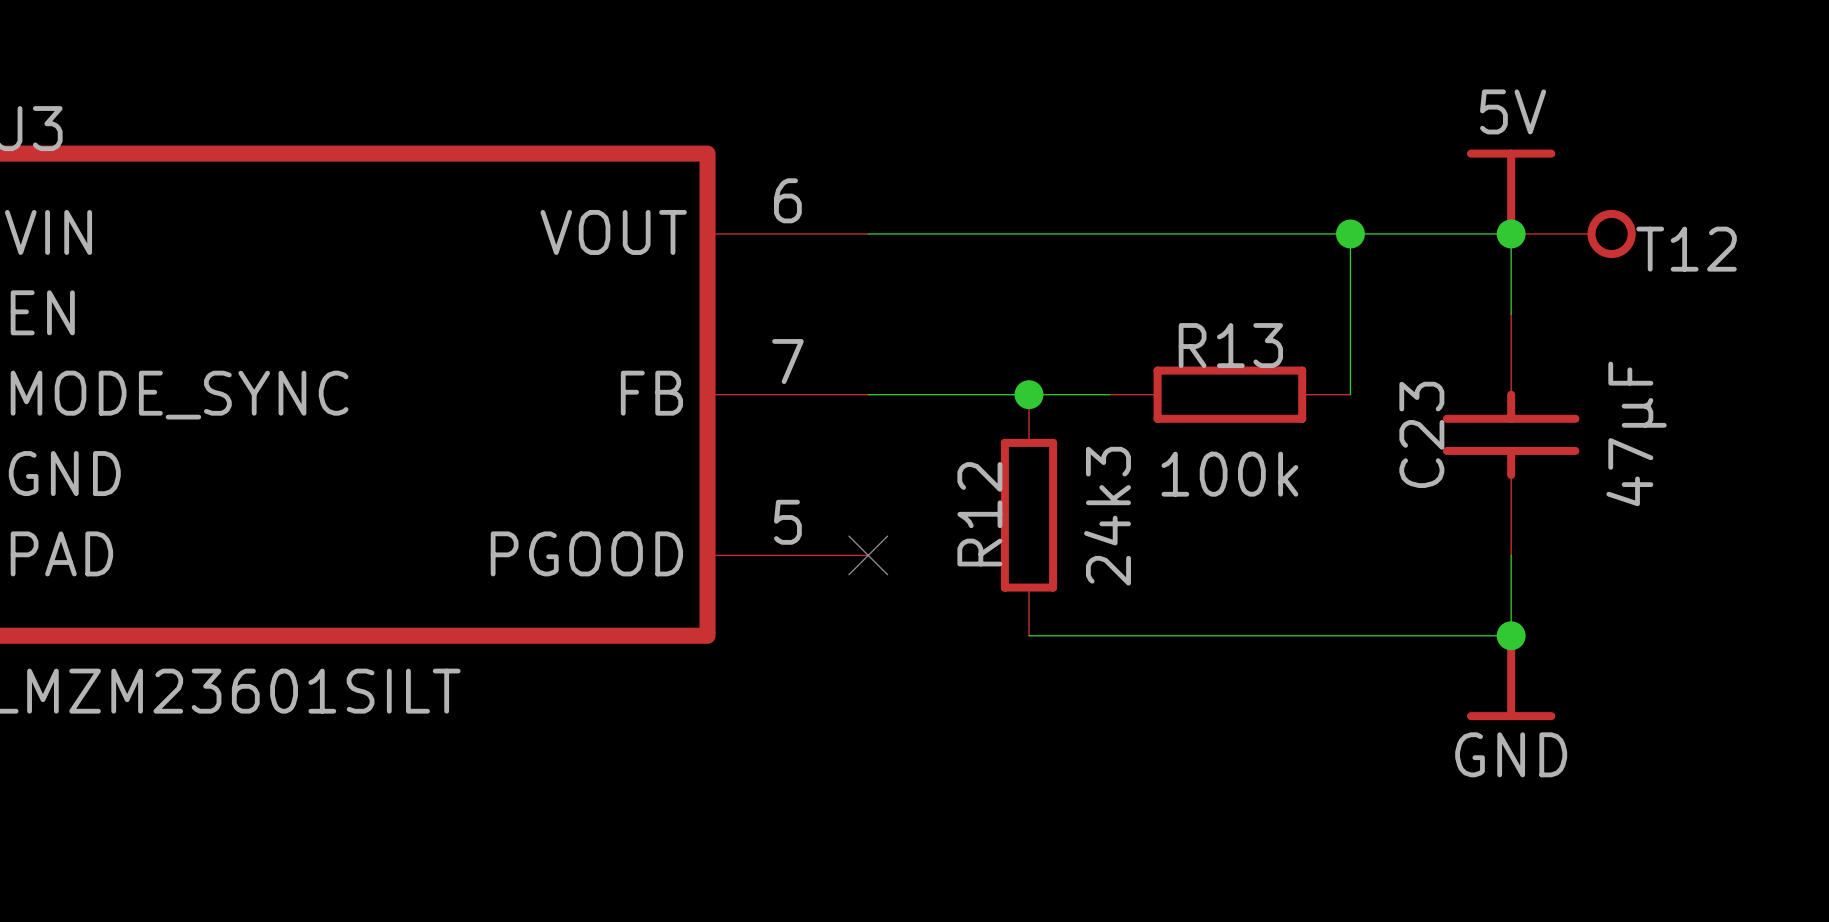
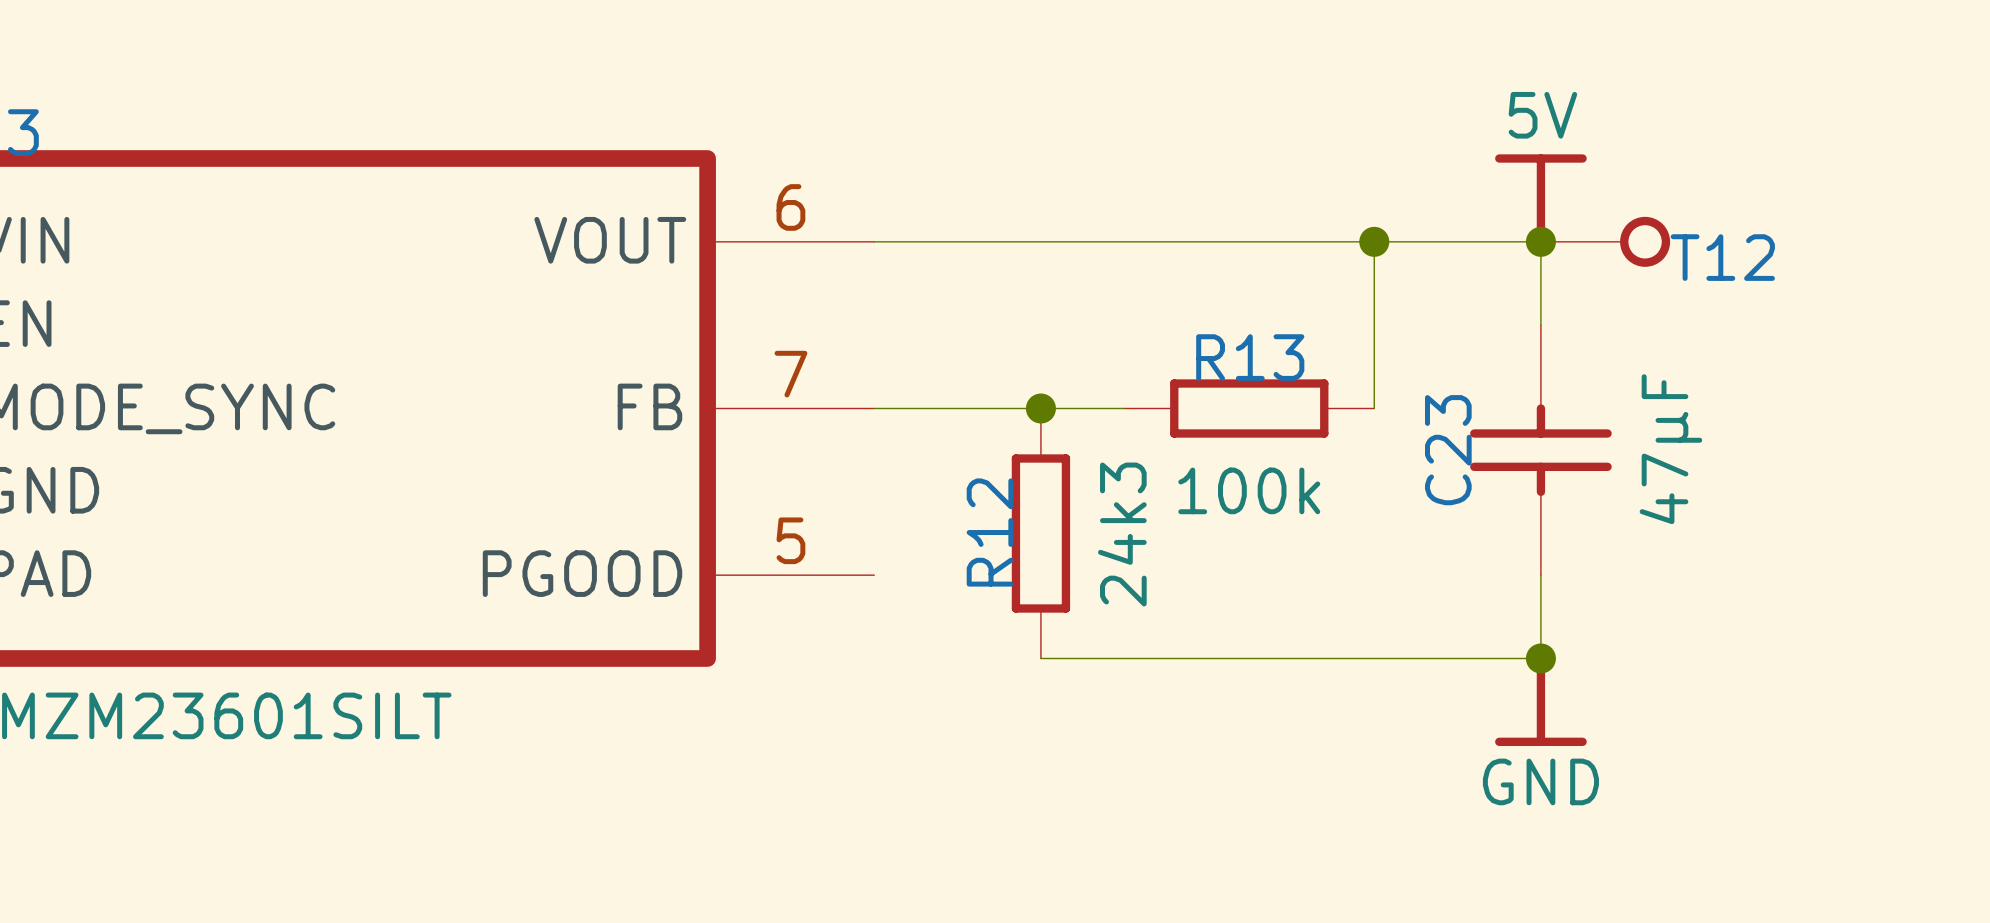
no-connect mark: (868, 555) -> none

